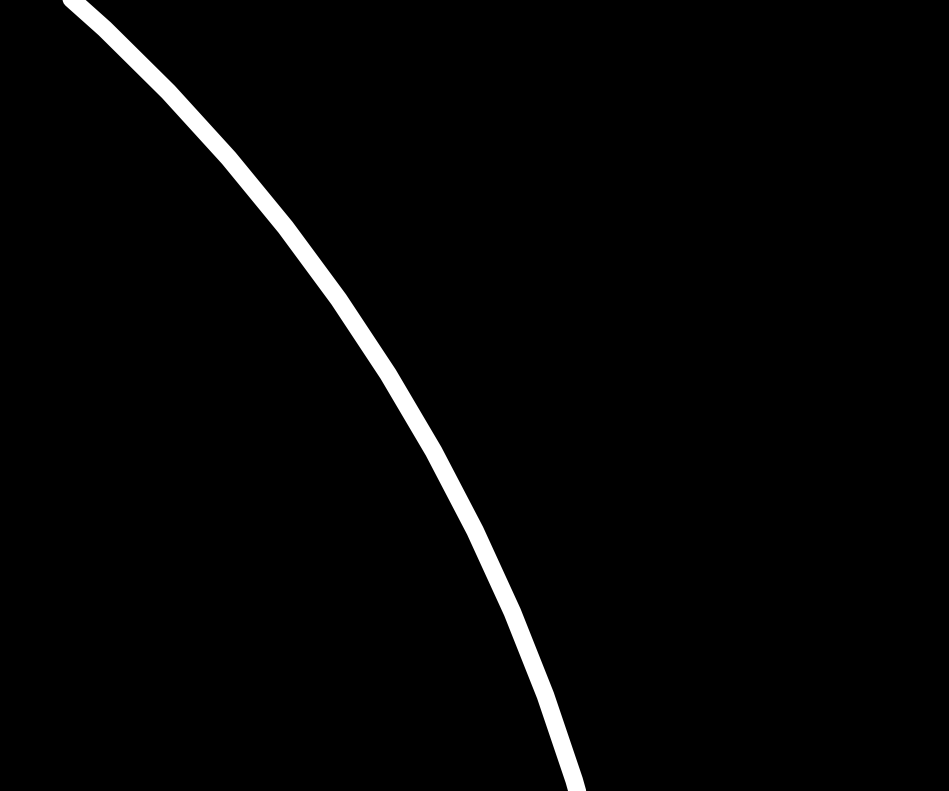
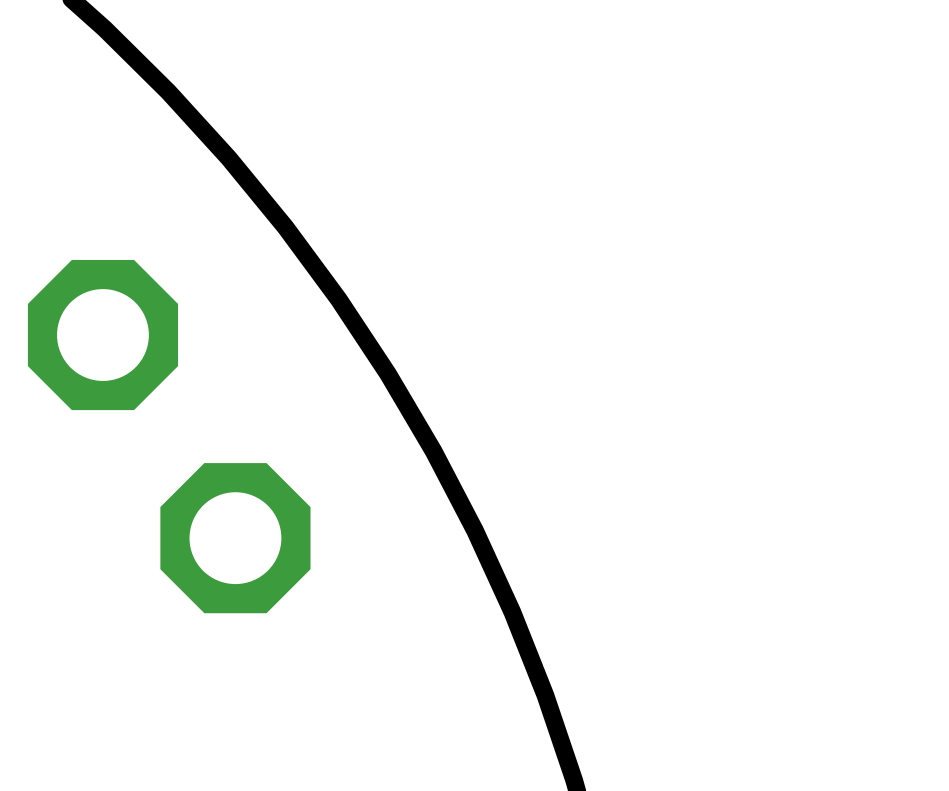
part: none -> (102, 335)
part: none -> (235, 538)

